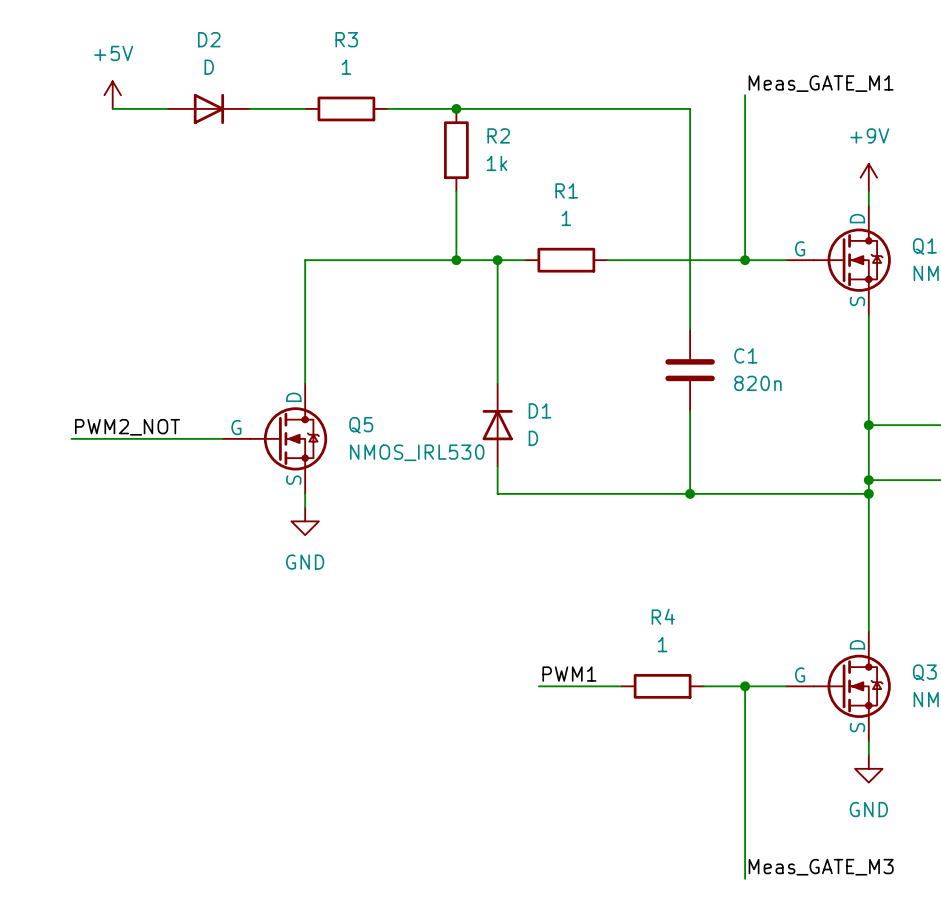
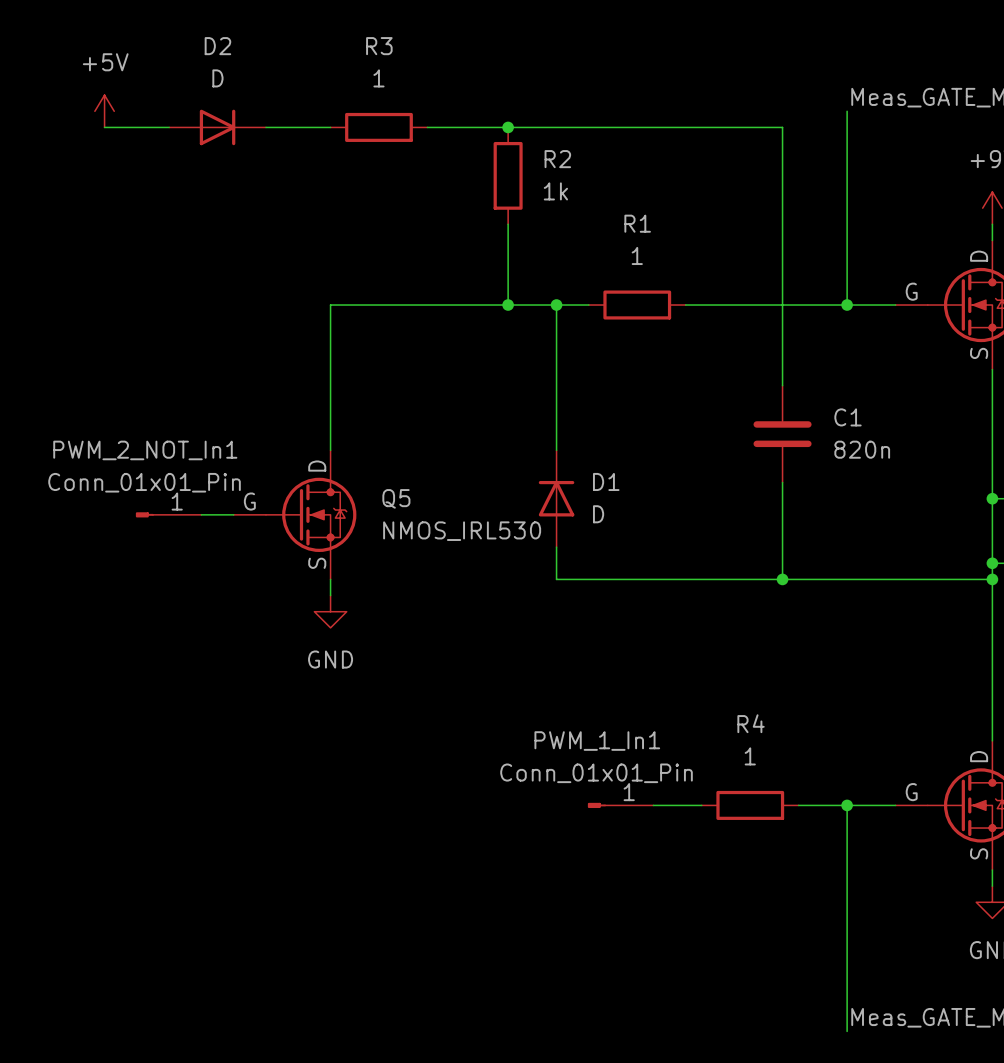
label: PWM2_NOT (127, 427) -> none
wire: (71, 438) (195, 438) -> none
PWM_2_NOT_In1: none -> Conn_01x01_Pin (168, 514)
label: PWM1 (569, 674) -> none
PWM_1_In1: none -> Conn_01x01_Pin (620, 805)

